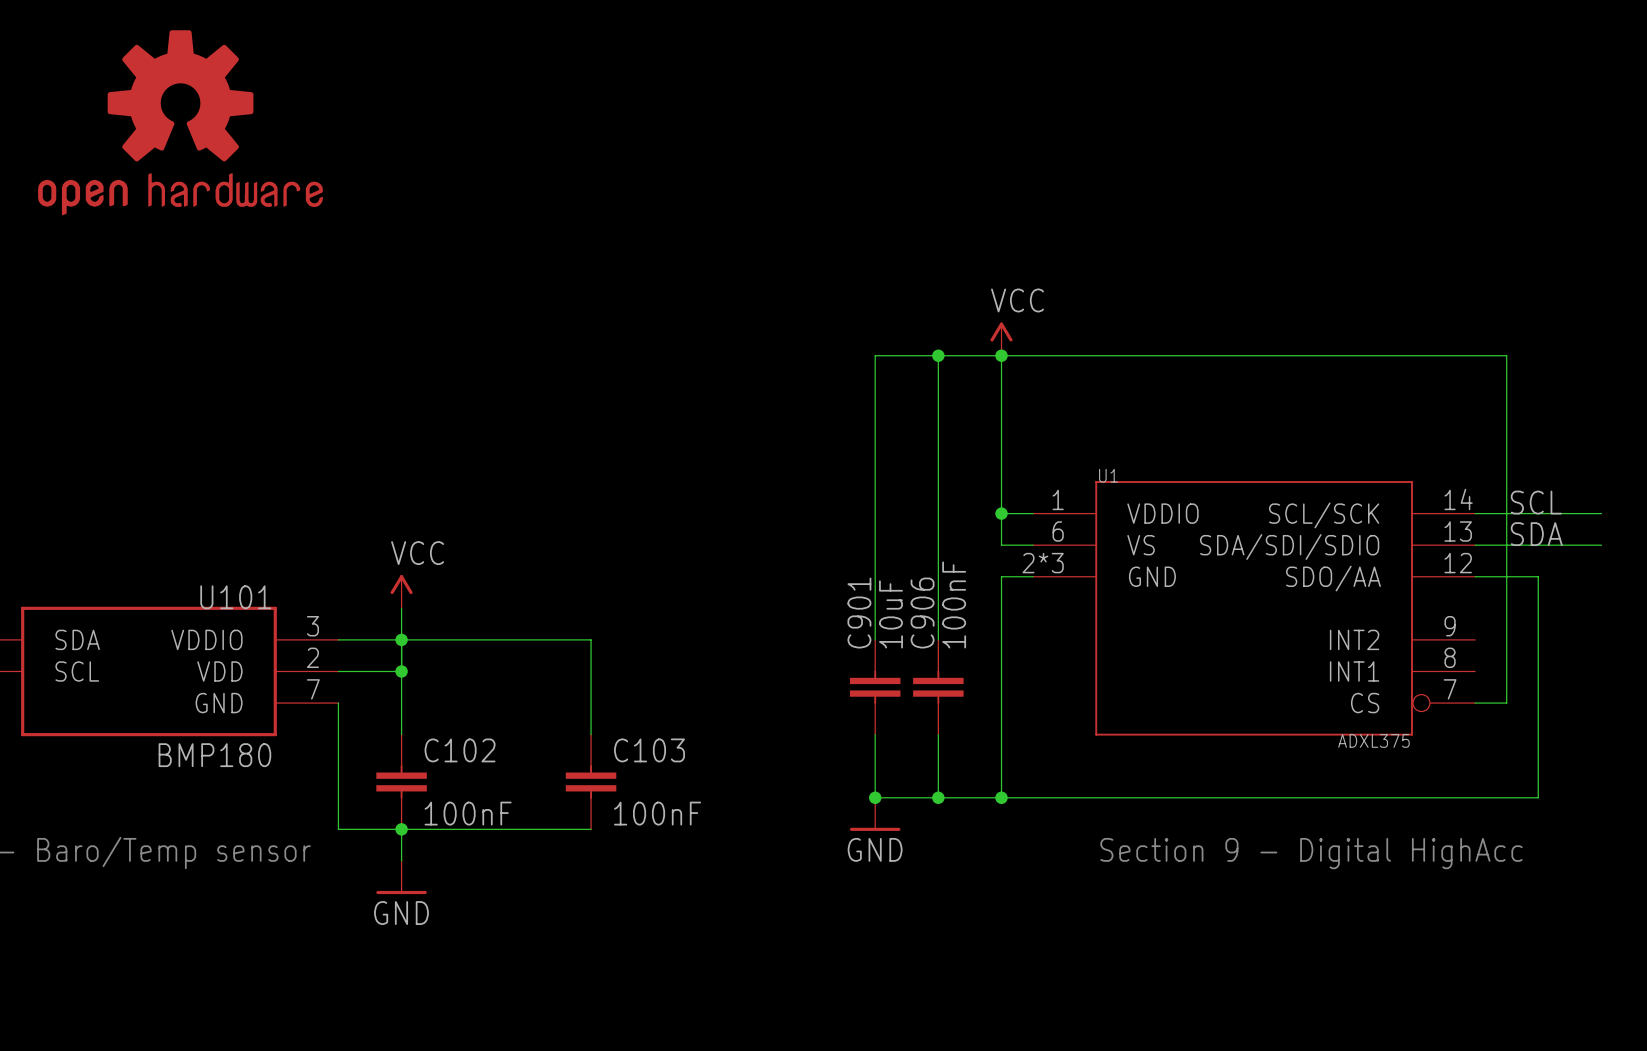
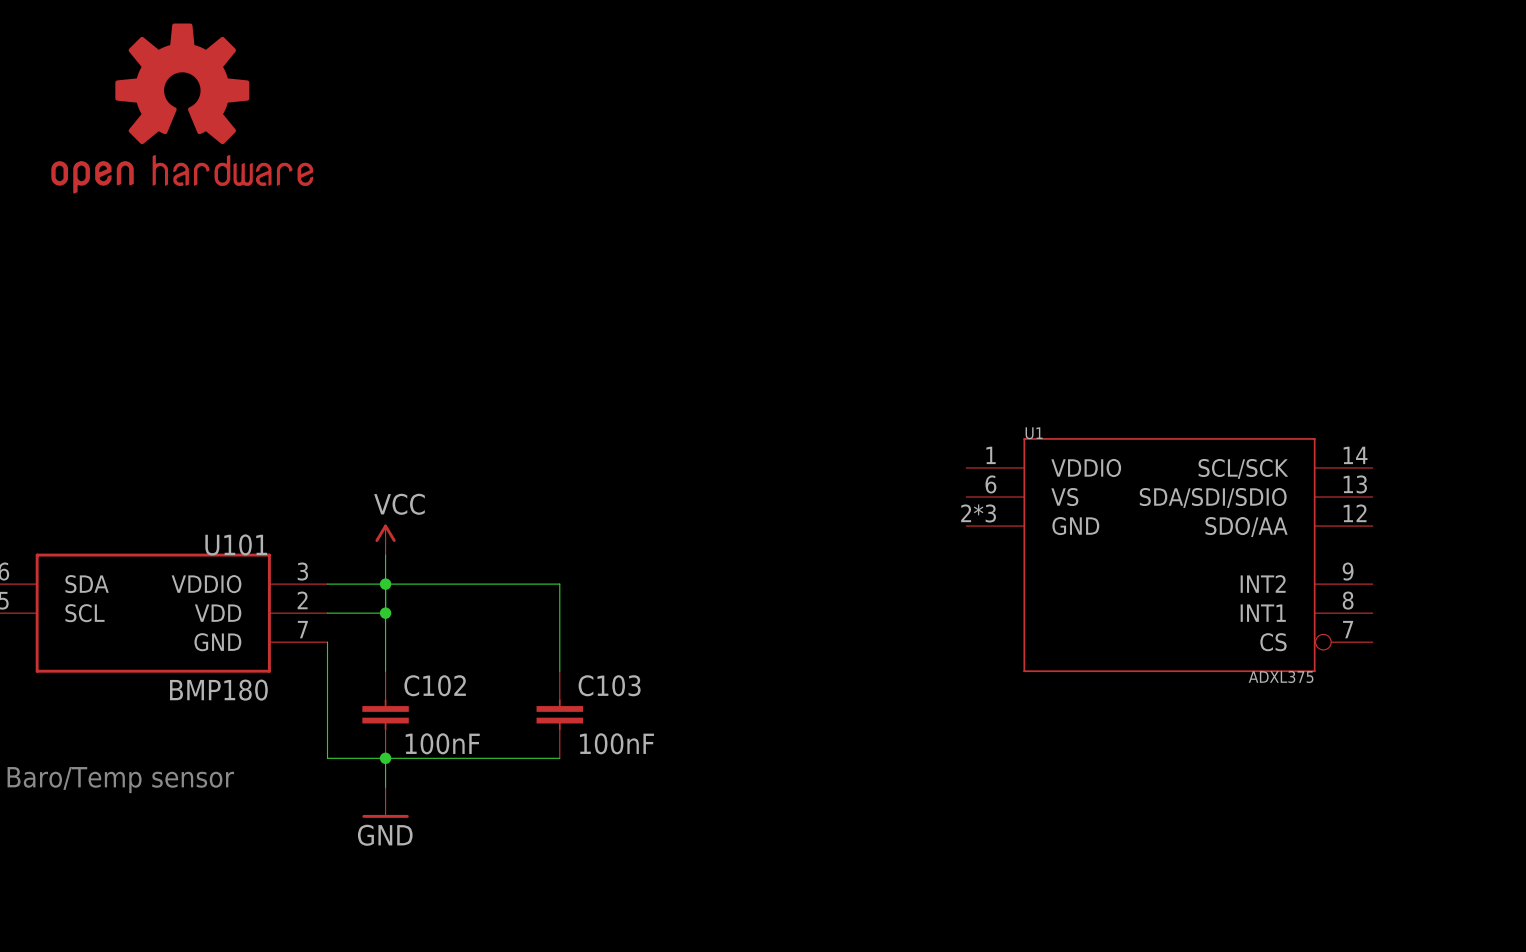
power symbol: VCC (1001, 339) -> none
wire: (938, 355) (938, 639) -> none
junction: (938, 355) -> none
wire: (1001, 355) (1001, 545) (1033, 545) -> none
junction: (1001, 355) -> none
label: SCL (1536, 502) -> none
wire: (1001, 513) (1033, 513) -> none
junction: (1001, 513) -> none
wire: (1475, 513) (1601, 513) -> none
label: SDA (1536, 534) -> none
wire: (1475, 545) (1601, 545) -> none
wire: (1033, 576) (1001, 576) (1001, 797) -> none
wire: (1475, 576) (1538, 576) (1538, 797) (875, 797) (875, 734) -> none
wire: (875, 639) (875, 355) (1506, 355) (1506, 703) (1475, 703) -> none
C901: 10uF (875, 687) -> none
C906: 100nF (938, 687) -> none
wire: (938, 734) (938, 797) -> none
junction: (875, 797) -> none
junction: (938, 797) -> none
junction: (1001, 797) -> none
power symbol: GND (875, 814) -> none
text: Section 9 - Digital HighAcc (1311, 853) -> none

